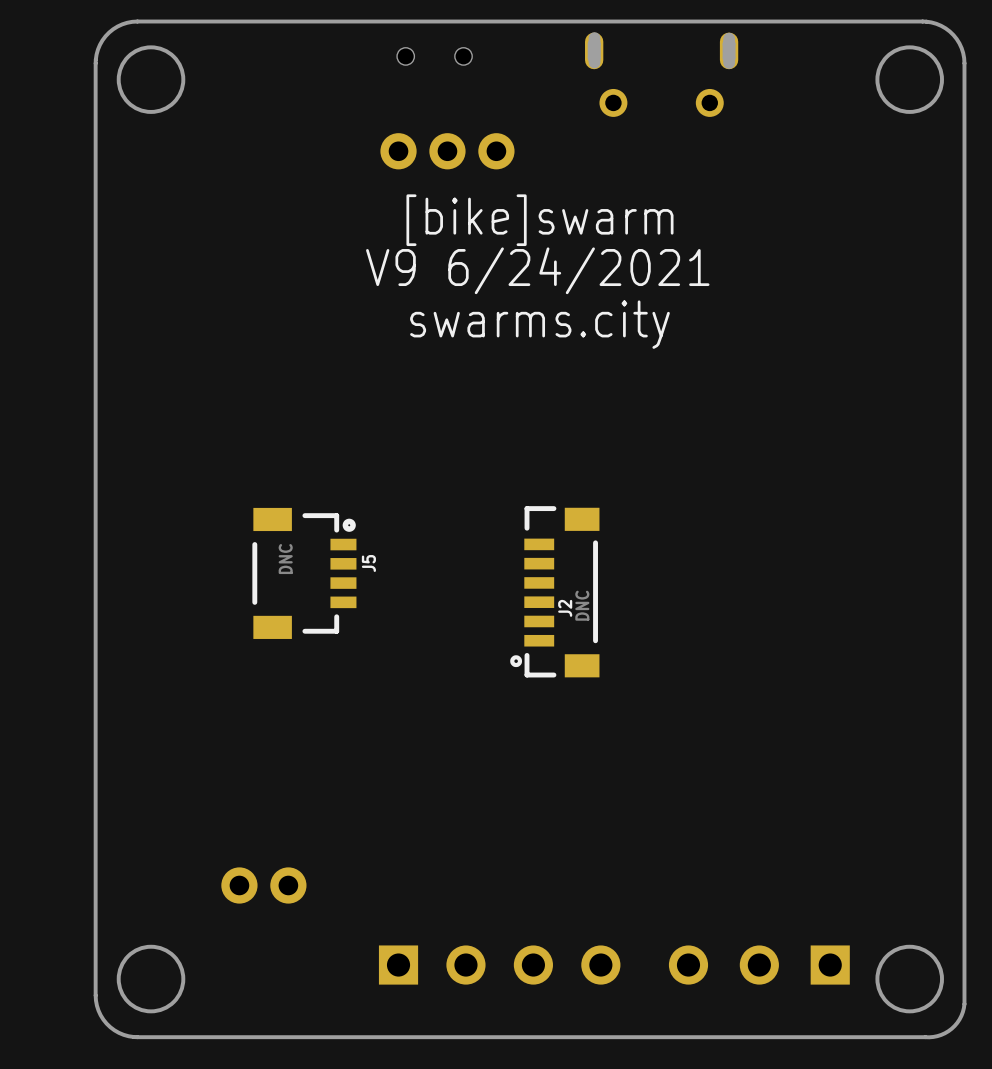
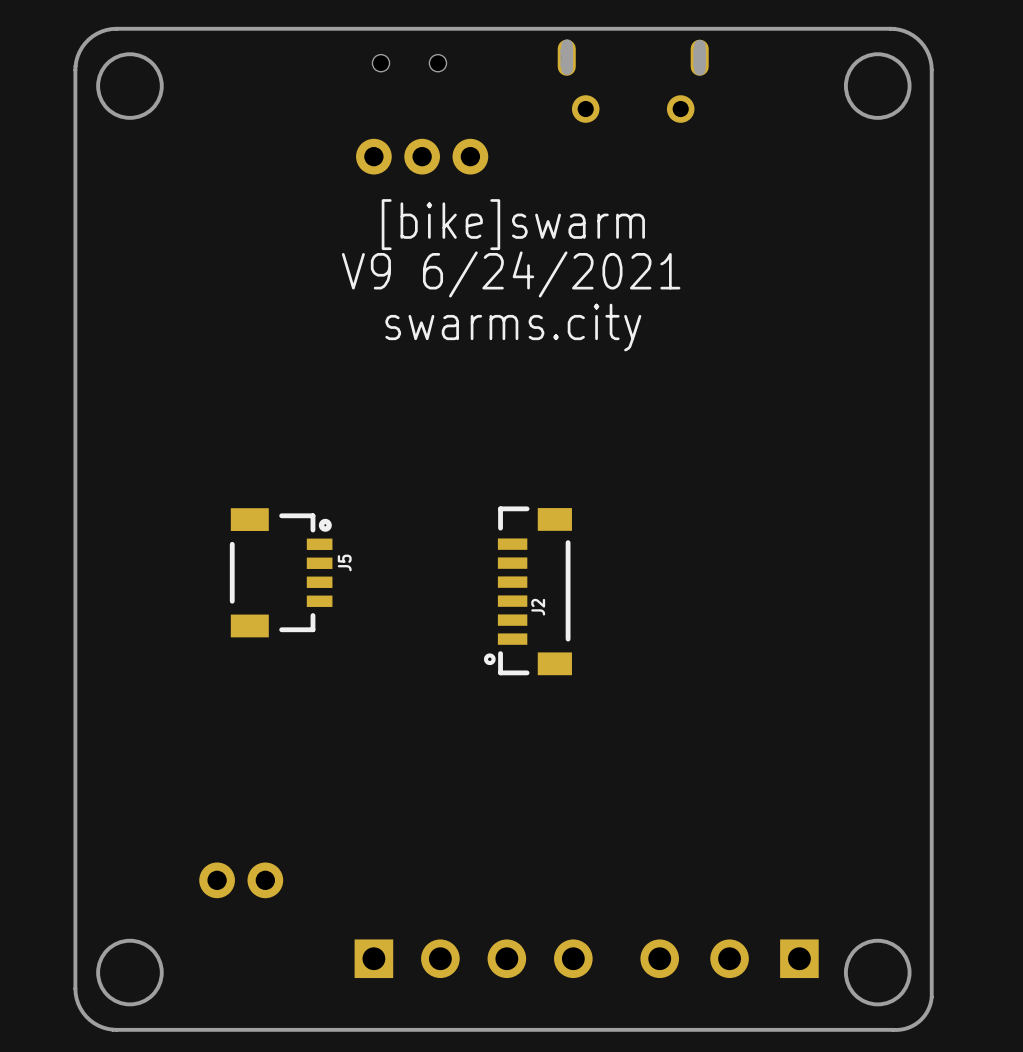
J5 value: DNC (285, 559) -> none
J2 value: DNC (582, 605) -> none

